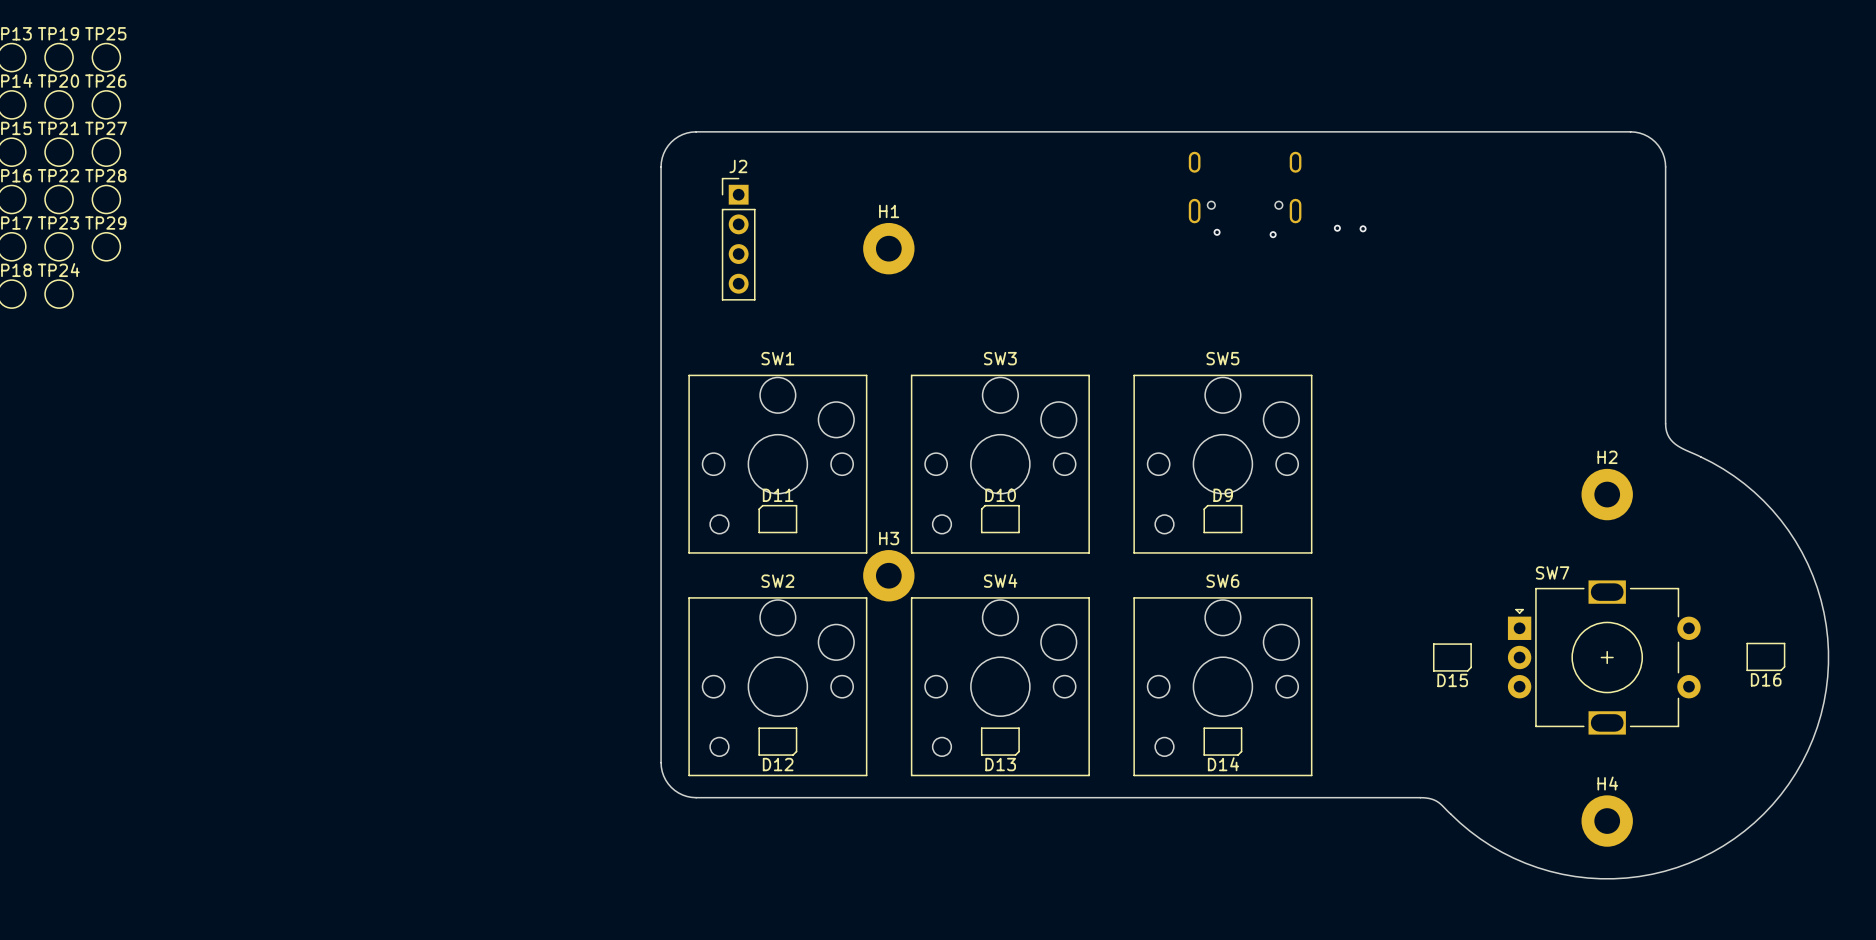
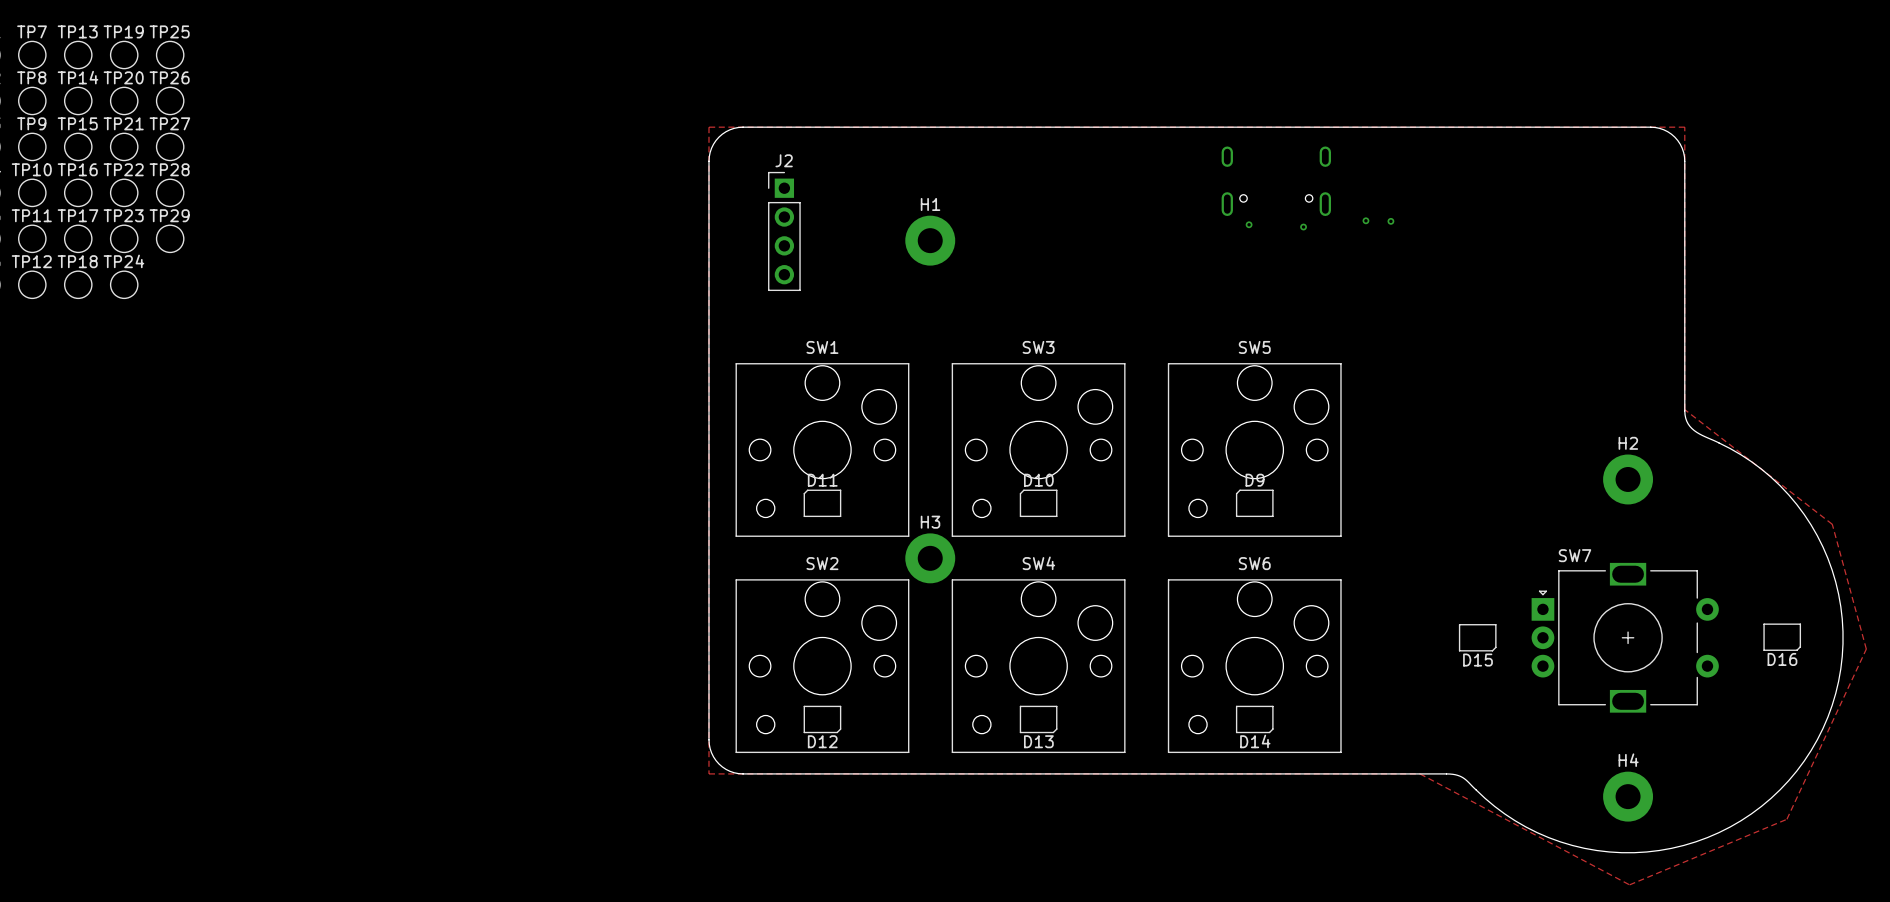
zone outline: none -> (708, 127) (708, 773) (1420, 773) (1629, 884) (1786, 819) (1866, 649) (1832, 524) (1684, 409) (1684, 127) (708, 127)

